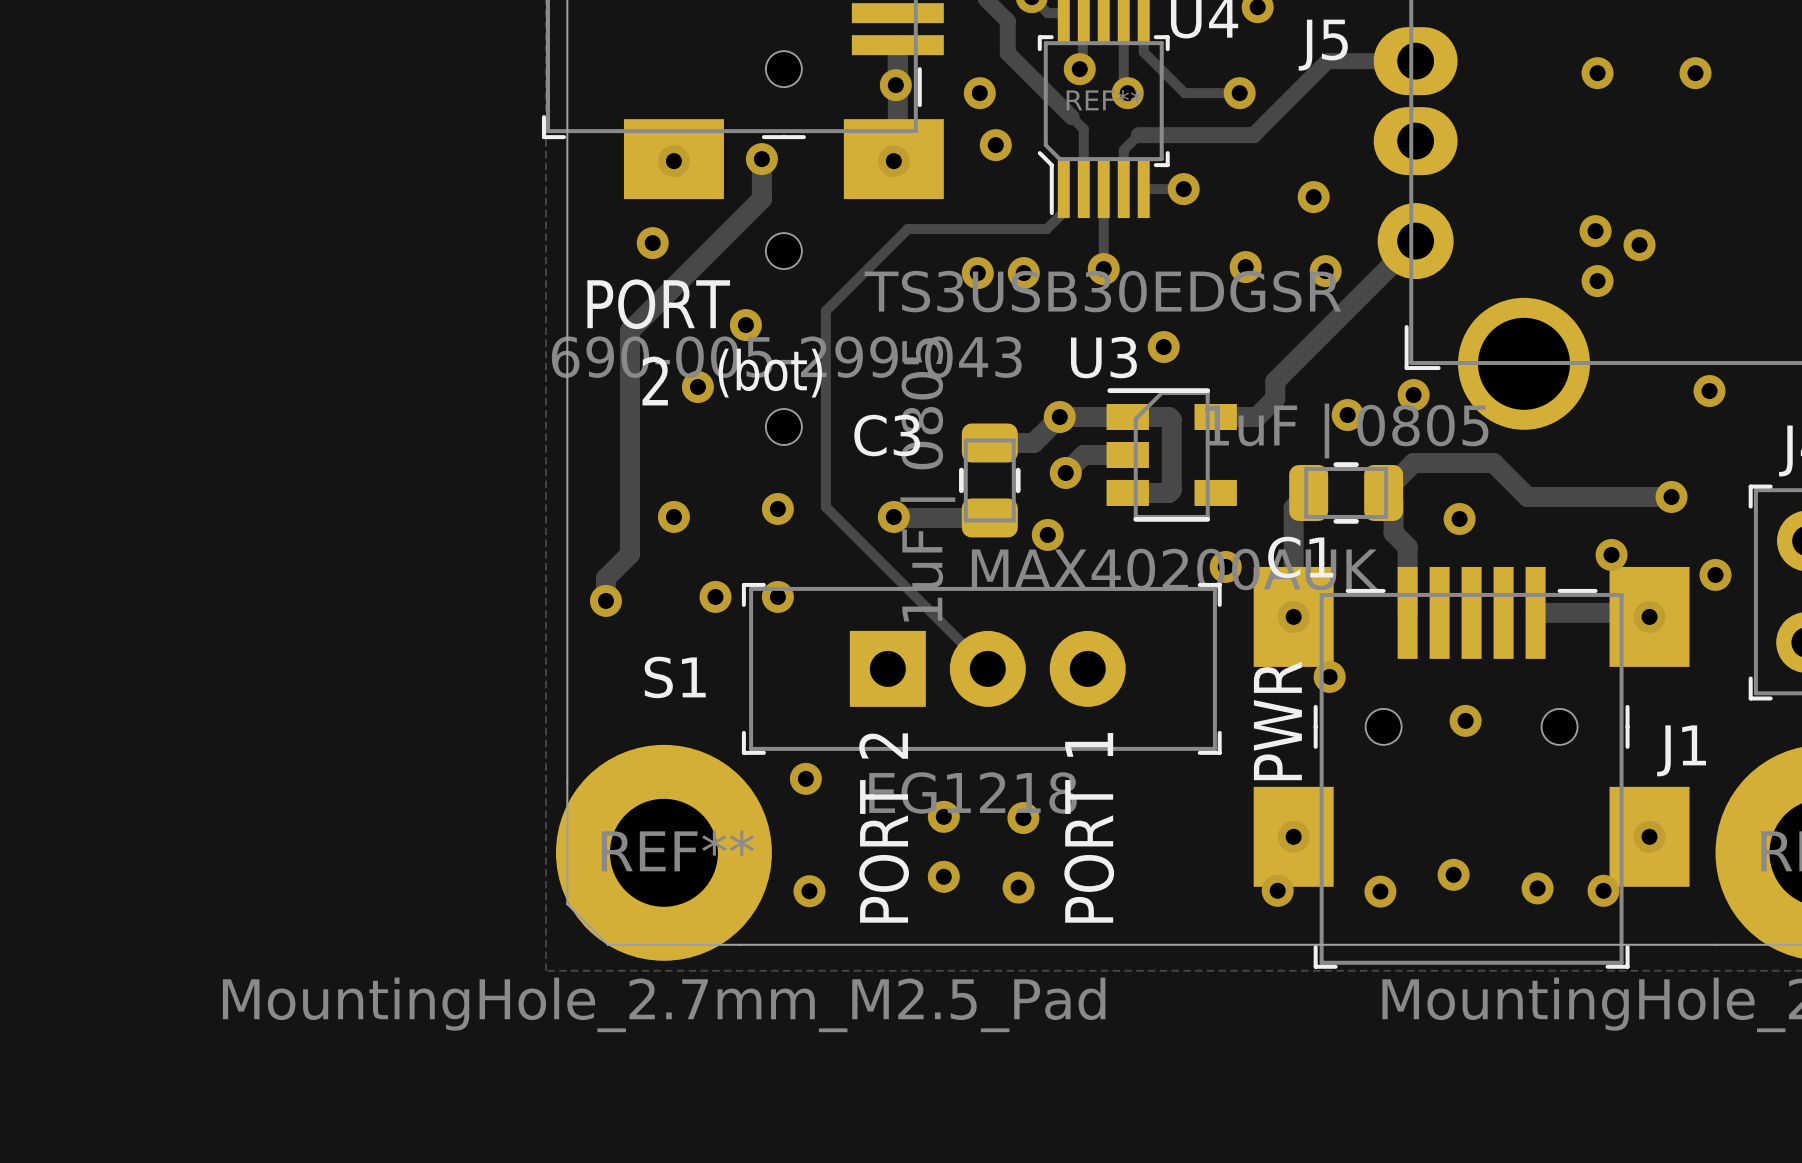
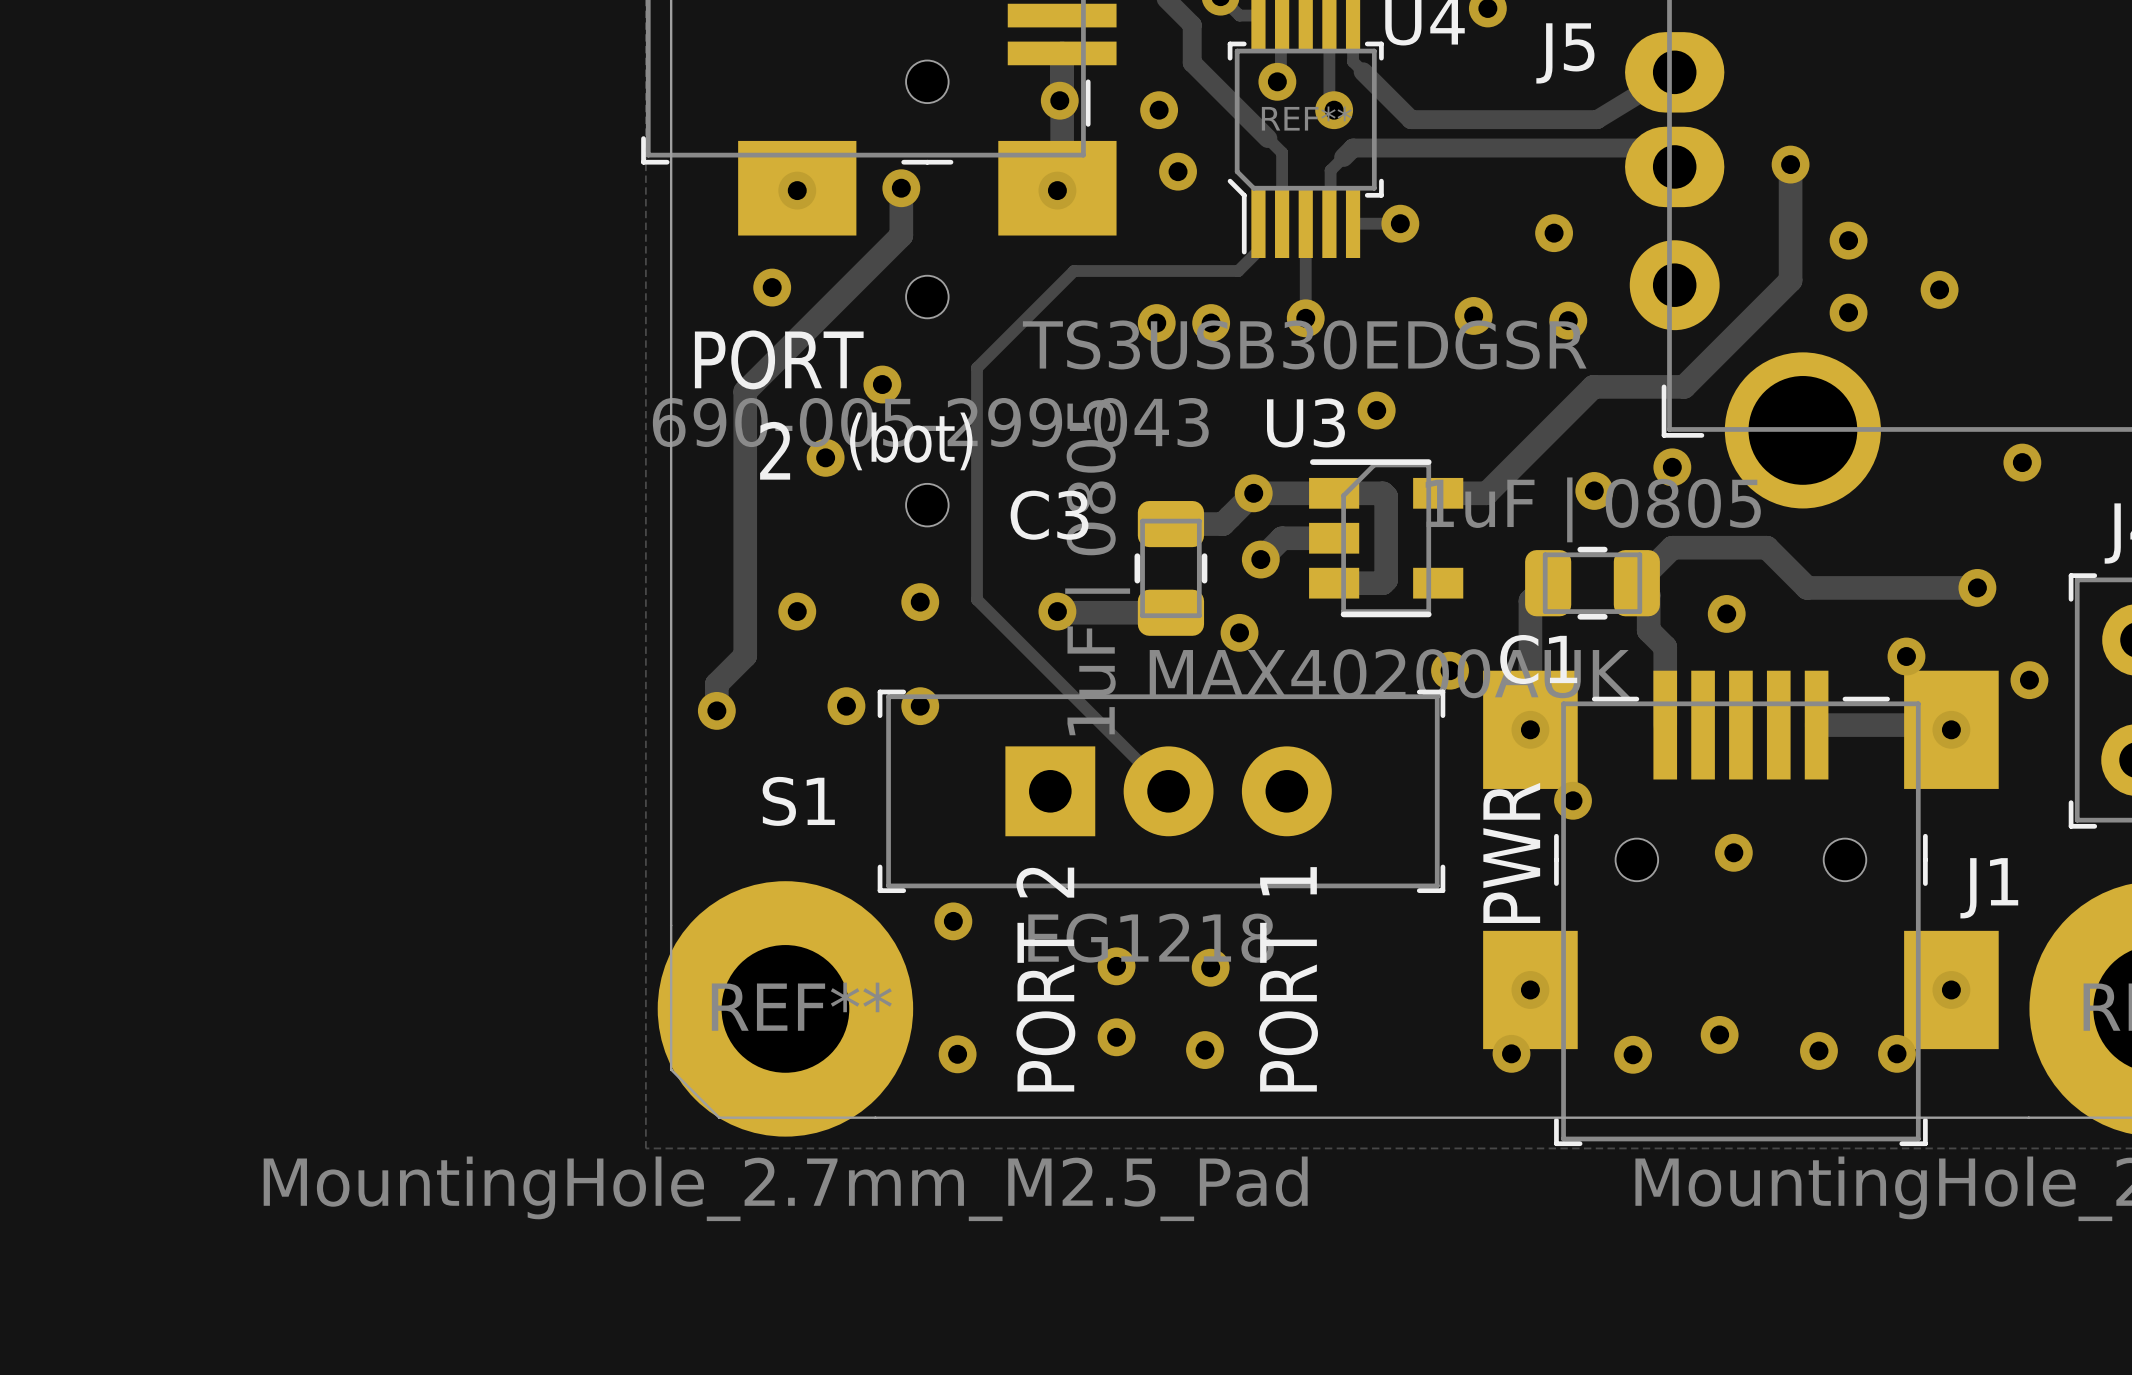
track width: thin (1152, 60) (1184, 93) -> thick (1363, 71) (1401, 110)
track: (1415, 61) (1327, 61) (1253, 135) (1138, 135) (1123, 150) (1123, 161) -> (1674, 166) (1655, 148) (1353, 148) (1330, 170) (1329, 190)
via: (1597, 73) -> none
via: (1695, 73) -> none
track: (1184, 93) (1239, 93) -> (1401, 110) (1410, 119) (1597, 119) (1674, 72)
via: (1239, 93) -> none
via: none -> (1790, 164)
via: none -> (1848, 240)
via: (1595, 231) -> none
track: (1415, 241) (1275, 381) (1275, 398) -> (1790, 162) (1790, 280) (1684, 386) (1593, 386) (1508, 471)
via: none -> (1848, 312)
via: (1597, 281) -> none

